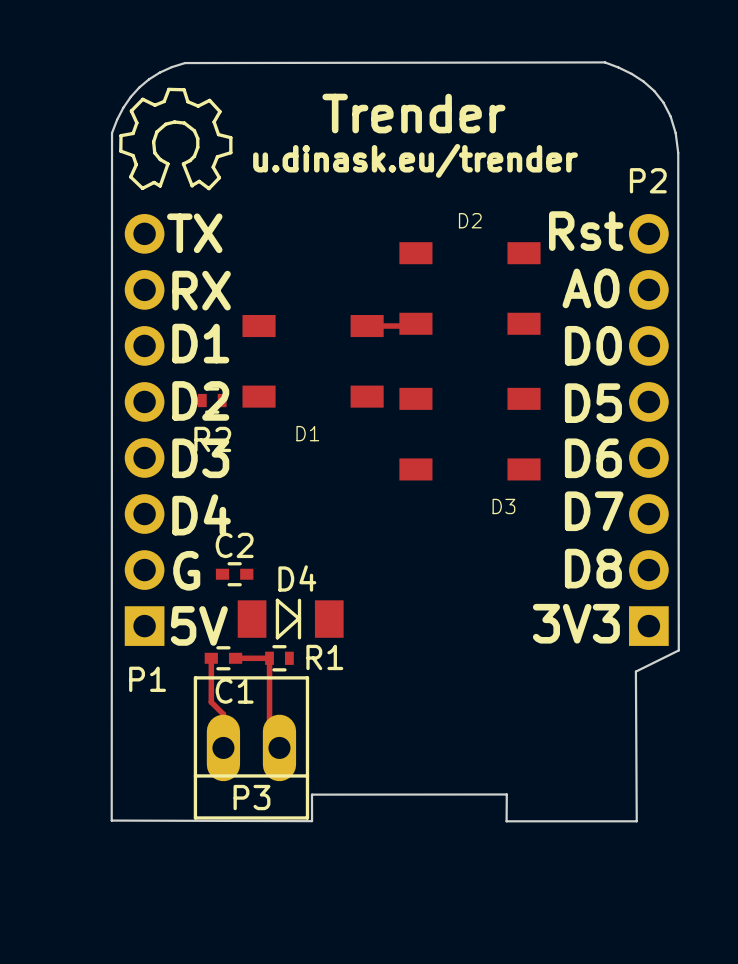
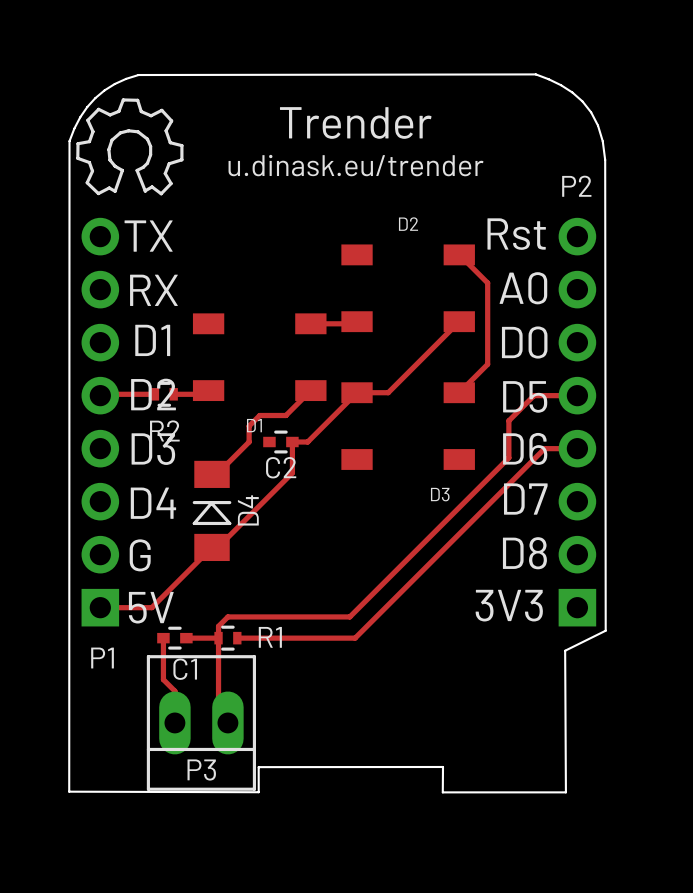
top track: none -> (459, 254) (487, 282) (487, 364) (459, 392)
top track: none -> (459, 321) (388, 392) (357, 392) (307, 442) (292, 442) (292, 472) (217, 547) (212, 547) (151, 607) (100, 607)
top track: none -> (310, 390) (285, 415) (259, 415) (249, 426) (249, 442) (216, 474) (212, 474)
top track: none -> (154, 394) (100, 395)
top track: none -> (173, 394) (204, 394)
top track: none -> (577, 395) (534, 395) (508, 420) (508, 457) (349, 616) (227, 616) (218, 626) (218, 638)
top track: none -> (577, 448) (544, 448) (355, 638) (237, 638)
C2 name position: C2 (234, 545) -> C2 (281, 467)
C2 position: (234, 574) -> (280, 442)
D4 name position: D4 (297, 578) -> D4 (248, 510)
D4 rotation: 0° (290, 619) -> 90° counterclockwise (212, 510)
D4 position: (290, 619) -> (212, 510)

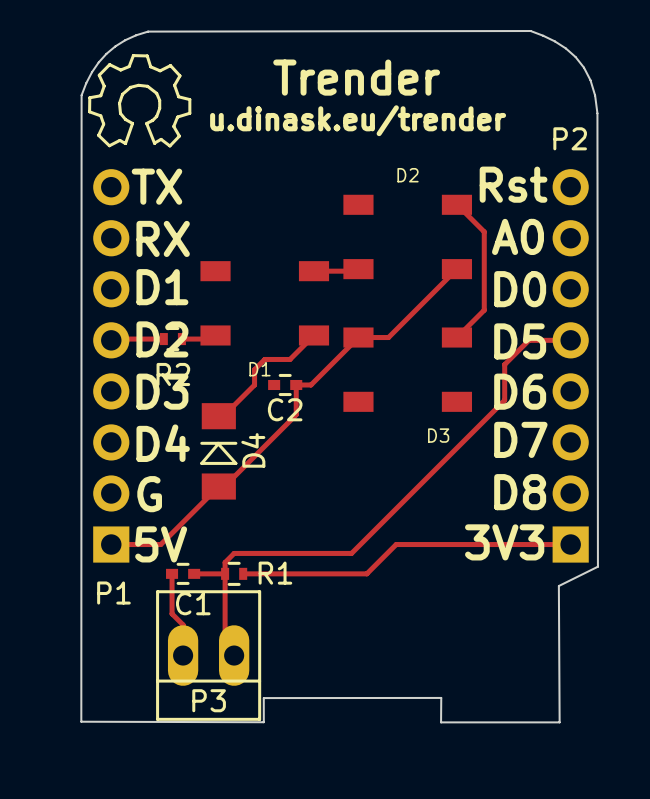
top track: (577, 448) (544, 448) (355, 638) -> (570, 544) (396, 544) (366, 573) (356, 573)

